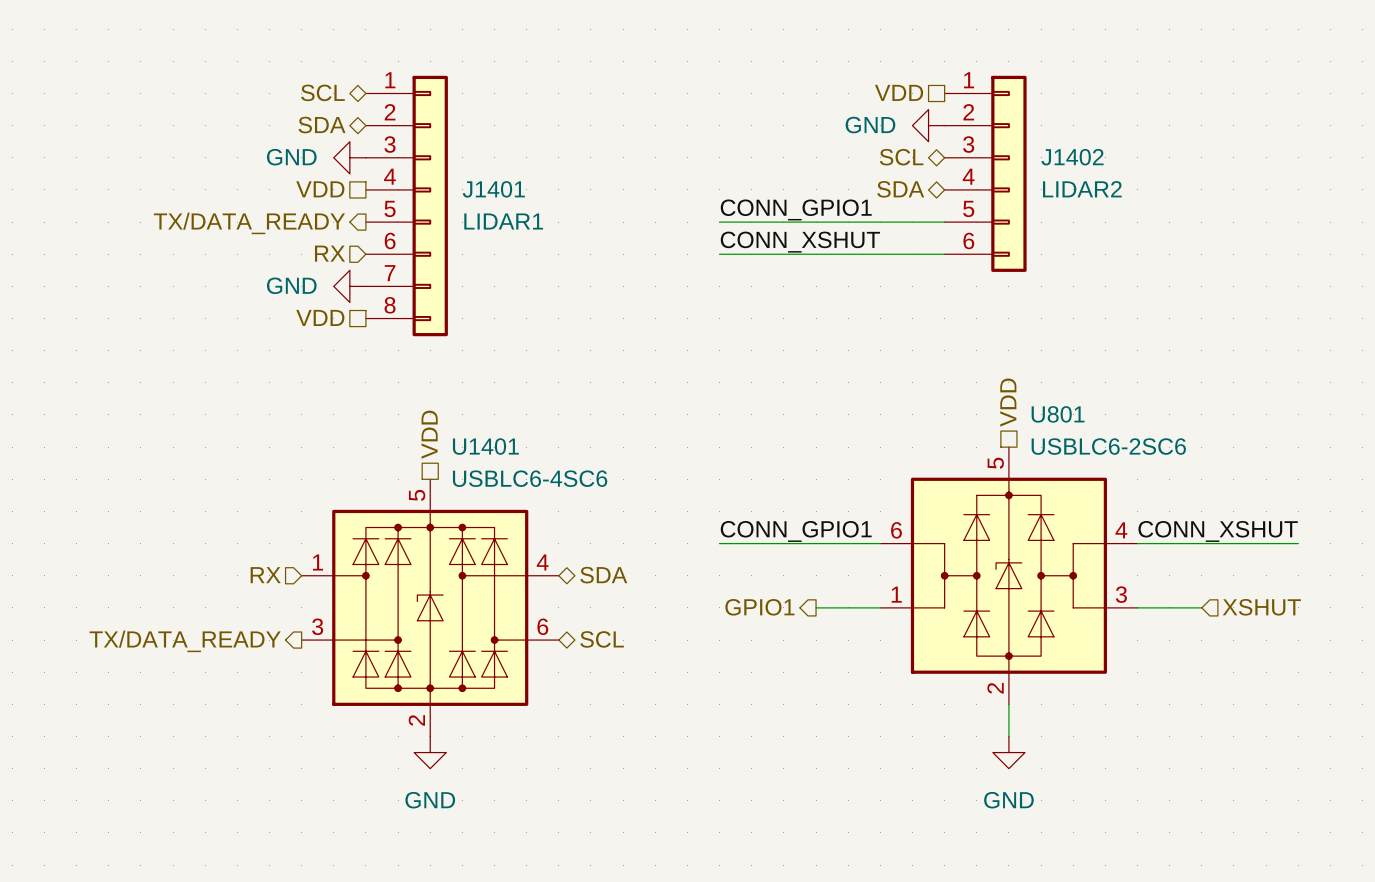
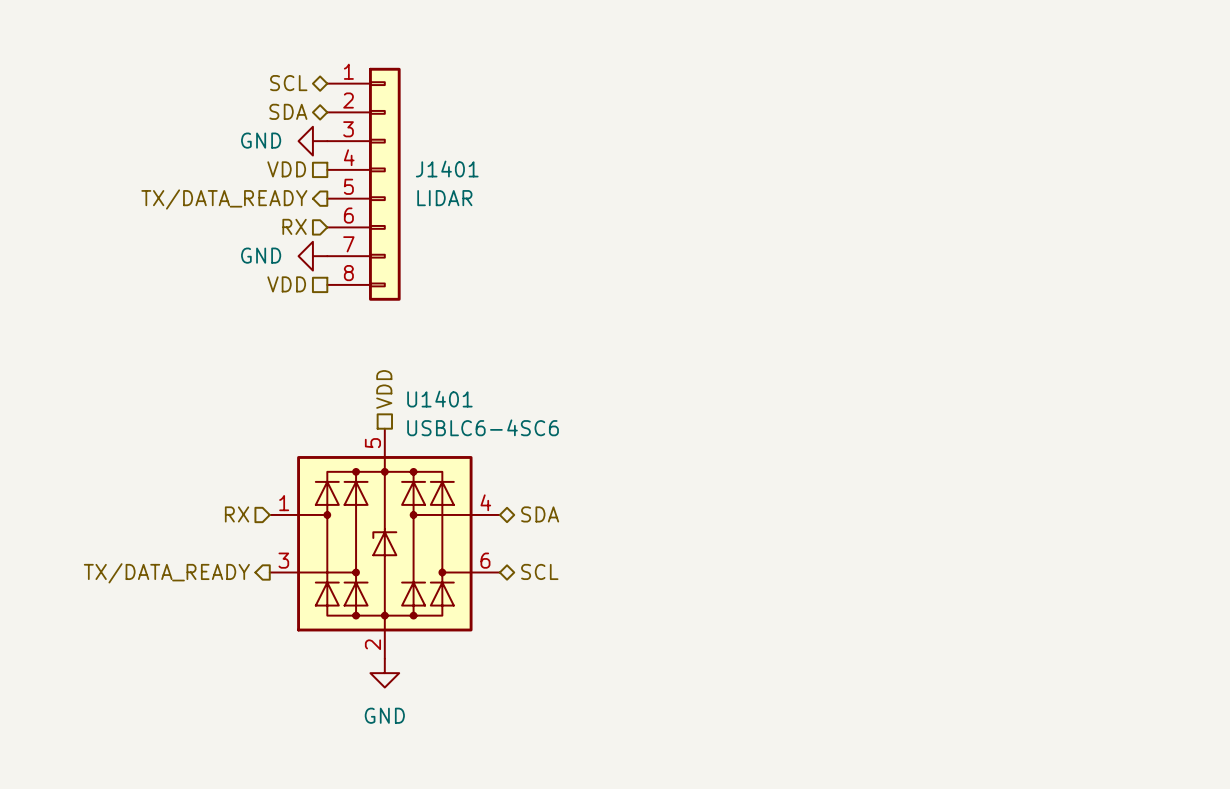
hierarchical label: VDD (899, 92) -> none
power symbol: GND (928, 125) -> none
hierarchical label: SCL (901, 157) -> none
J1402: LIDAR2 (985, 173) -> none
hierarchical label: SDA (900, 189) -> none
label: CONN_GPIO1 (796, 209) -> none
J1401 value: LIDAR1 (503, 221) -> LIDAR (444, 198)
wire: (719, 222) (944, 222) -> none
label: CONN_XSHUT (800, 242) -> none
wire: (719, 254) (944, 254) -> none
hierarchical label: VDD (1008, 402) -> none
label: CONN_GPIO1 (796, 531) -> none
label: CONN_XSHUT (1218, 531) -> none
wire: (719, 543) (880, 543) -> none
wire: (1137, 543) (1298, 543) -> none
U801: USBLC6-2SC6 (1008, 575) -> none
hierarchical label: GPIO1 (759, 607) -> none
wire: (816, 607) (880, 607) -> none
wire: (1137, 607) (1201, 607) -> none
hierarchical label: XSHUT (1261, 607) -> none
wire: (1008, 704) (1008, 736) -> none
power symbol: GND (1008, 752) -> none

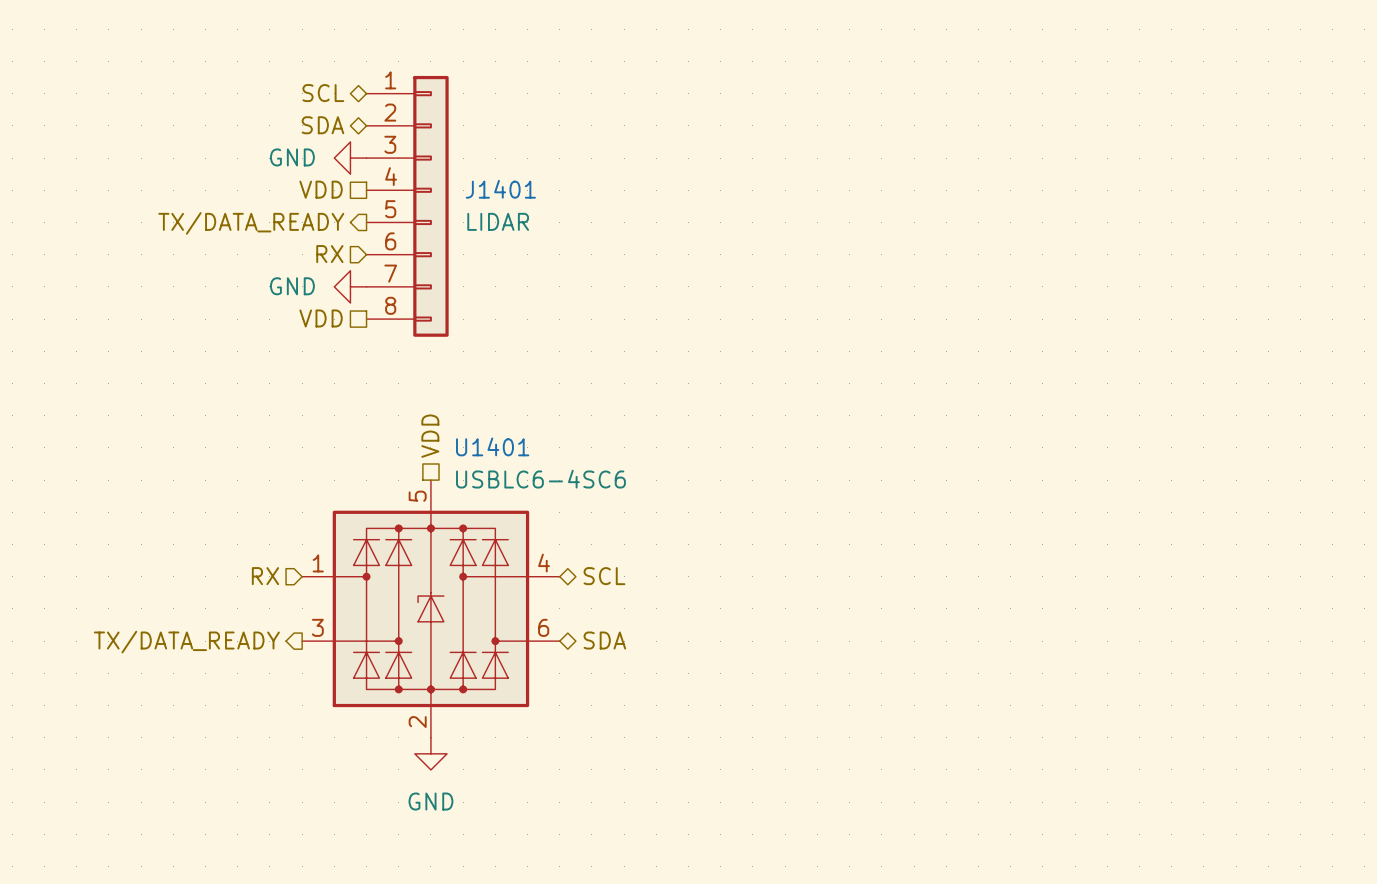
hierarchical label: SDA (540, 514) -> SCL (604, 576)
hierarchical label: SCL (539, 571) -> SDA (604, 640)

